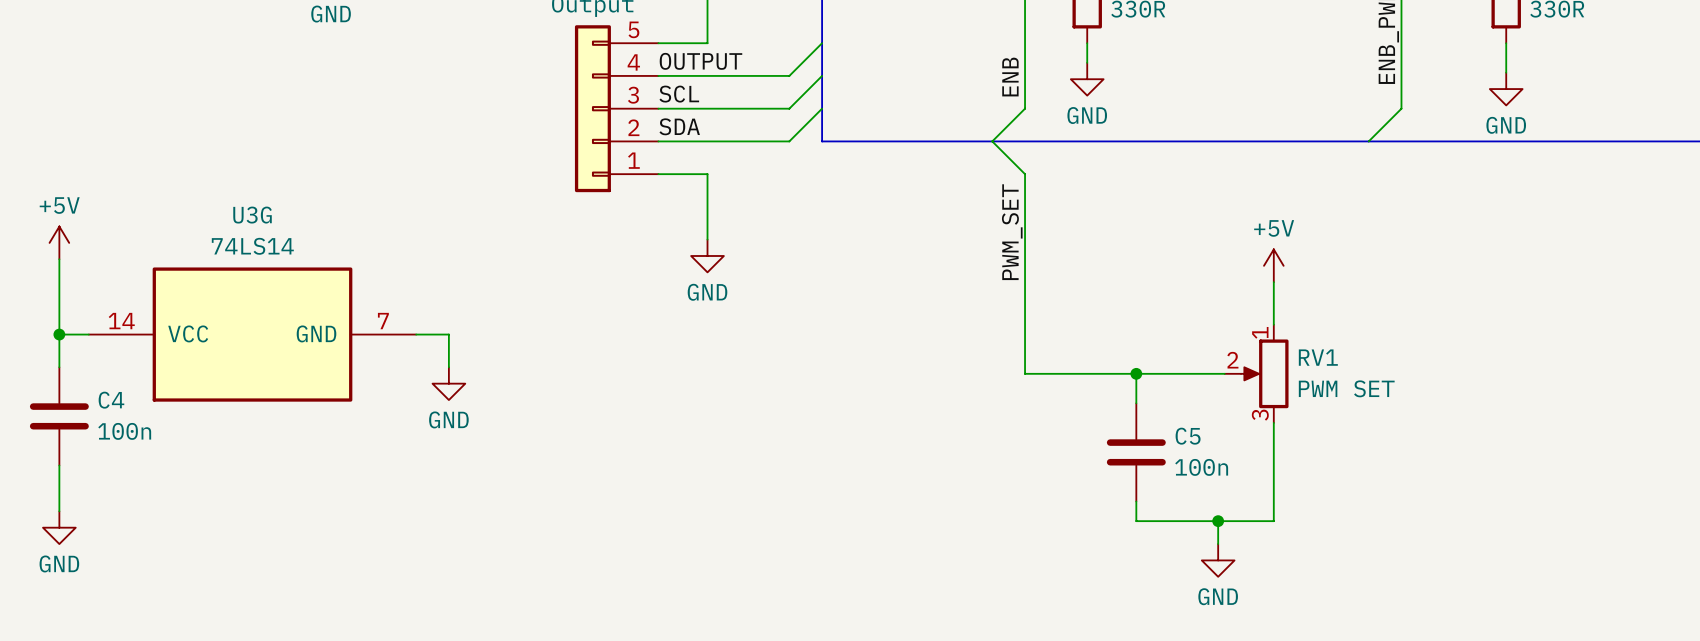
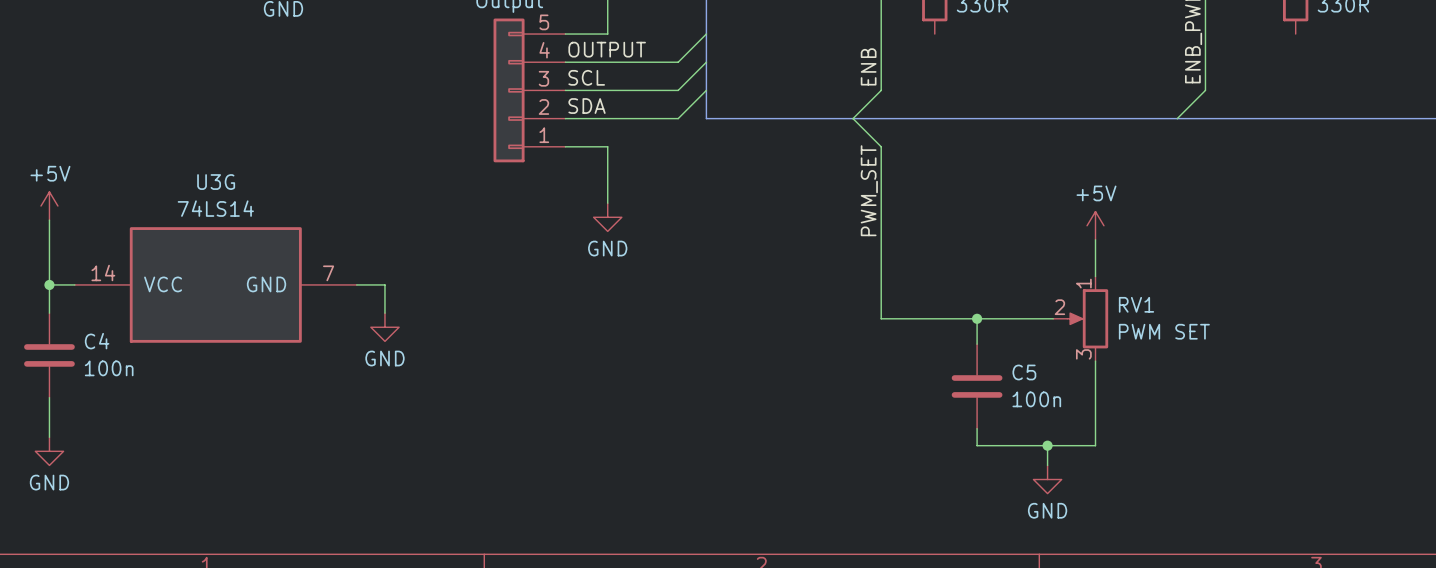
wire: (1087, 43) (1087, 62) -> none
wire: (1506, 43) (1506, 72) -> none
power symbol: GND (1087, 79) -> none
power symbol: GND (1506, 89) -> none

